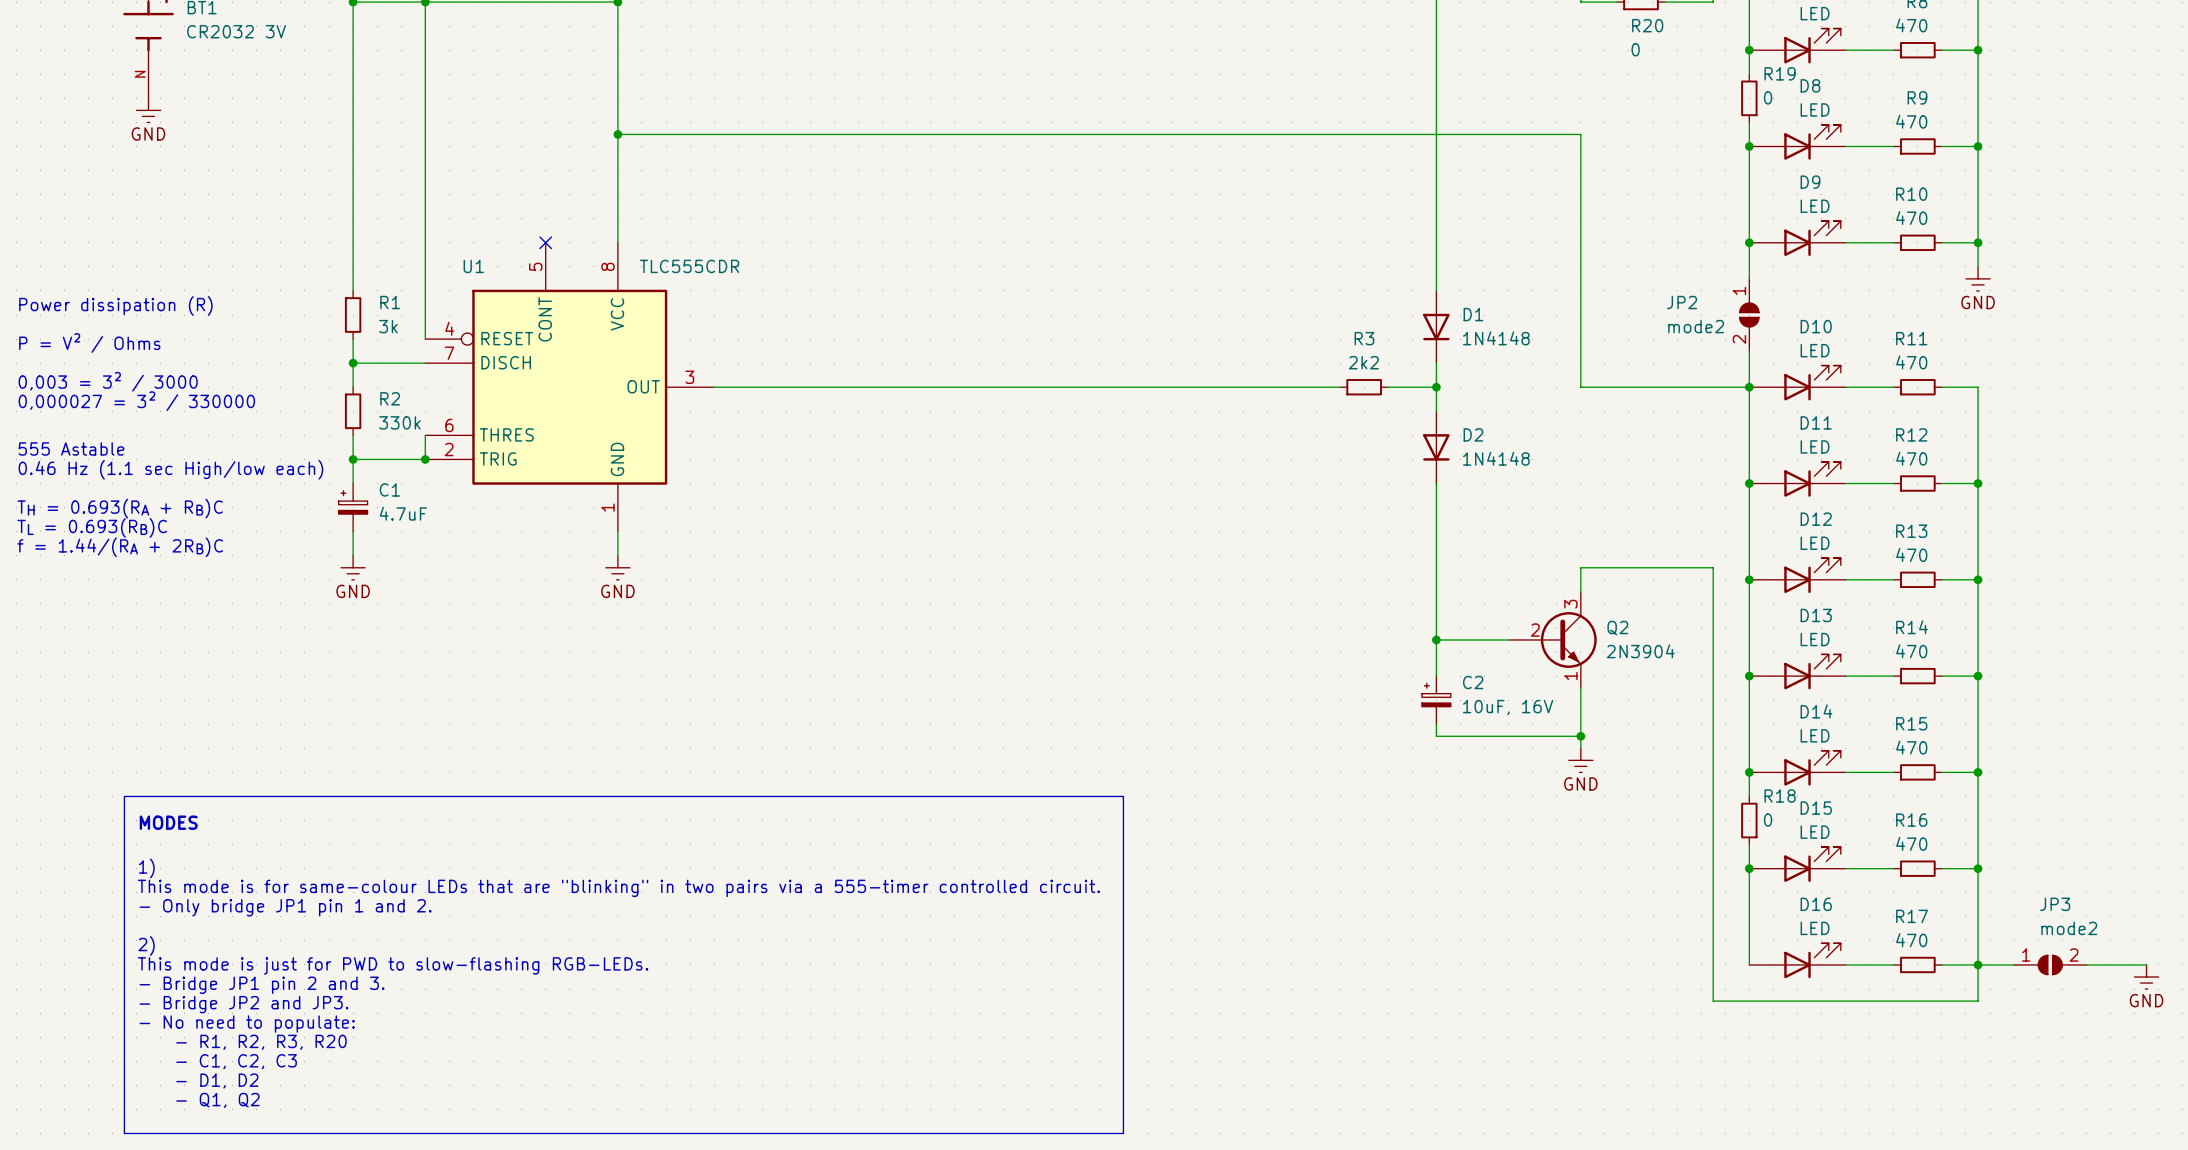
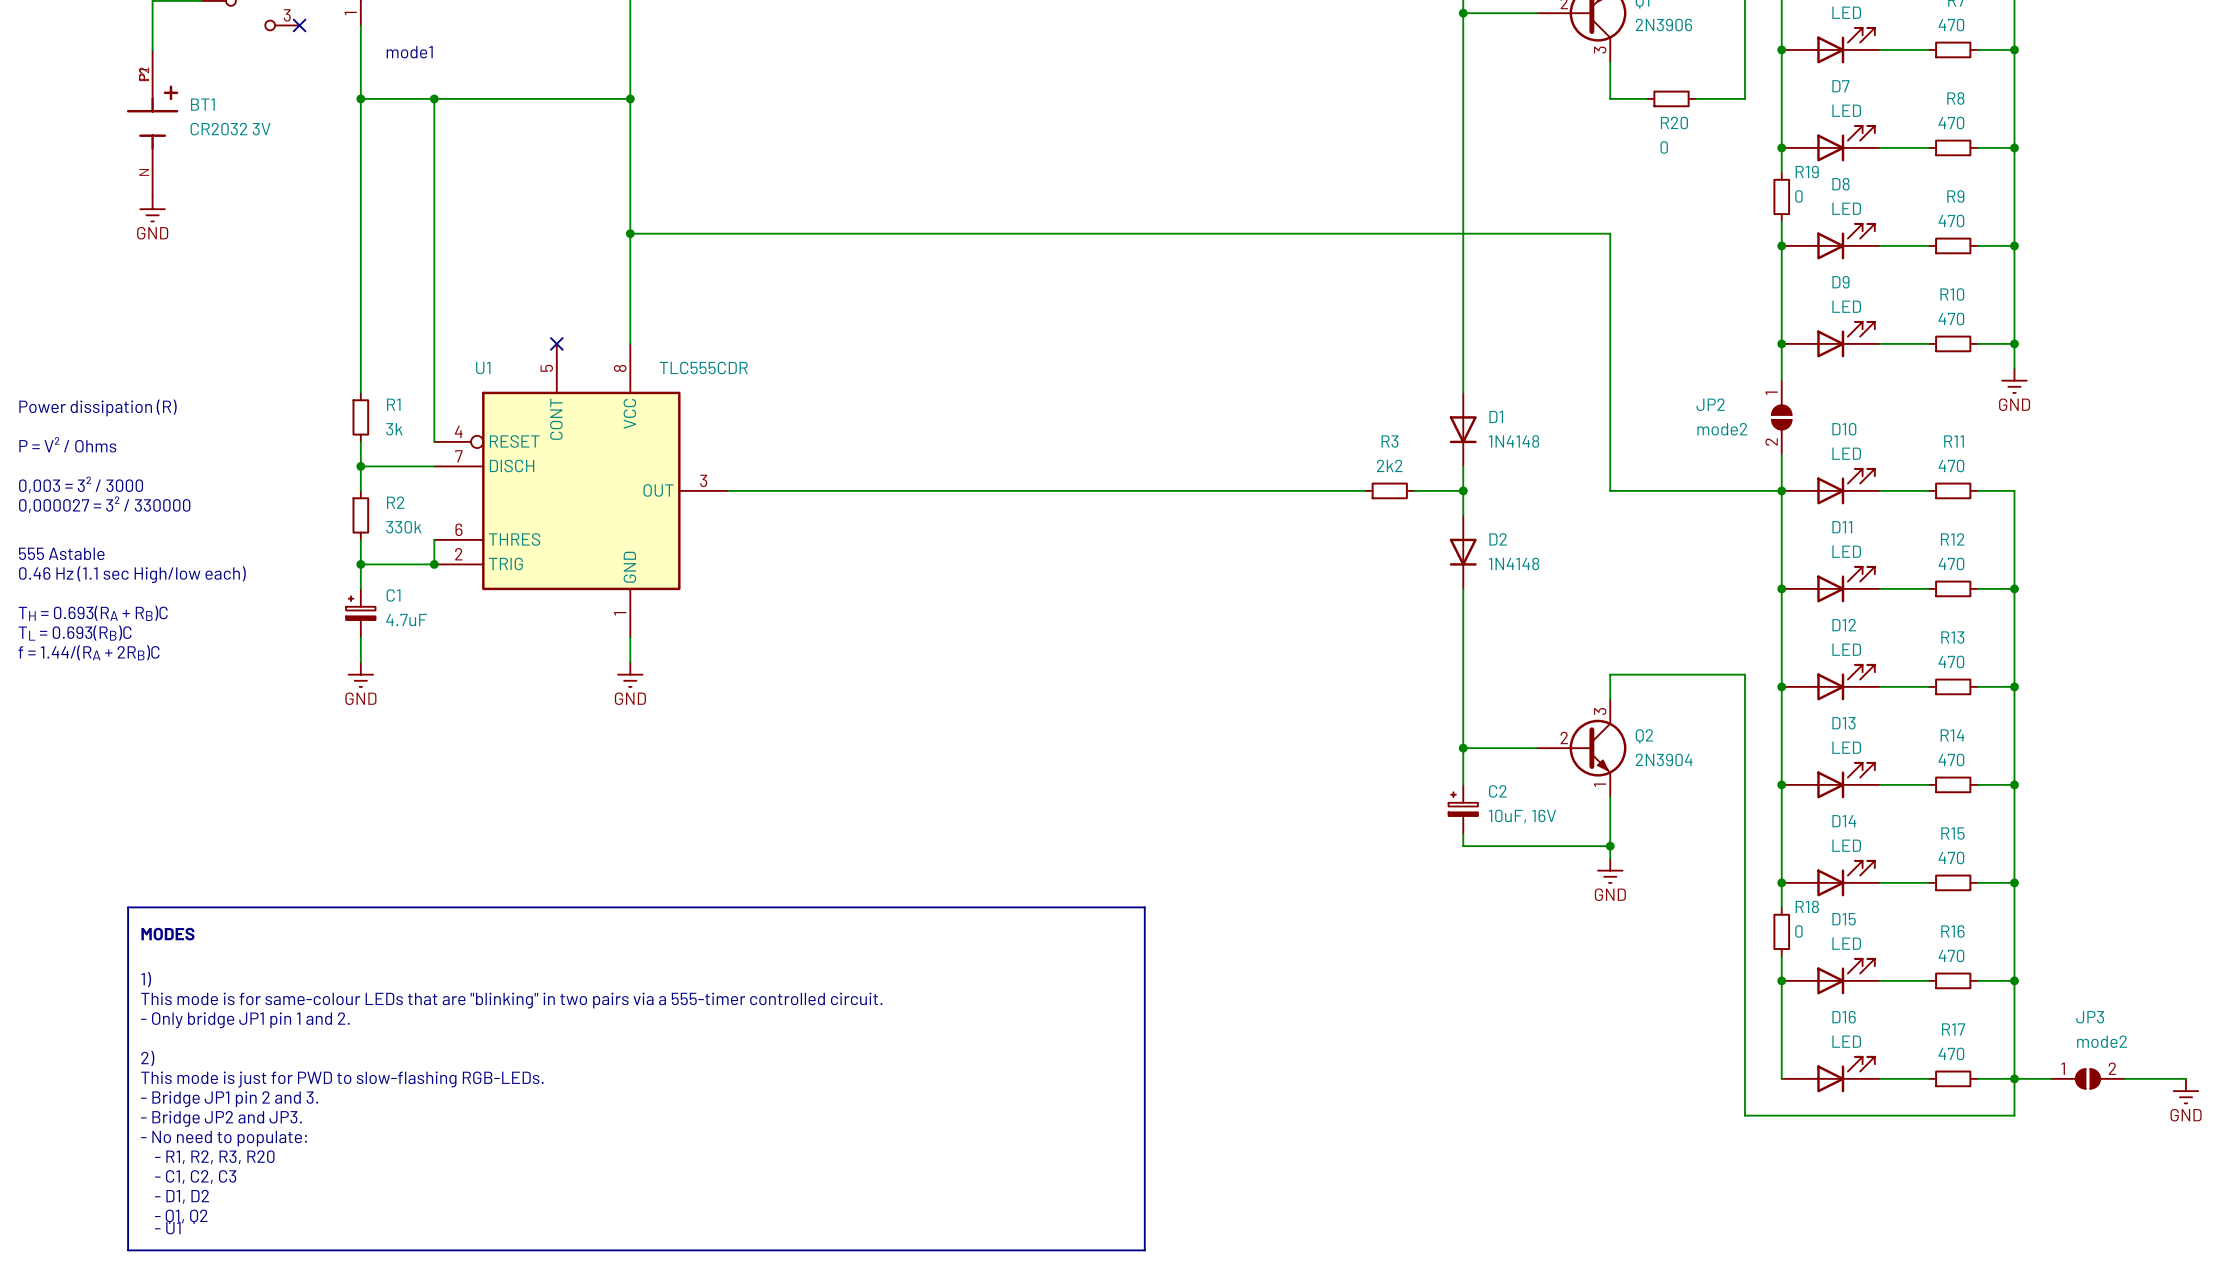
text: none -> - U1 (167, 1228)

